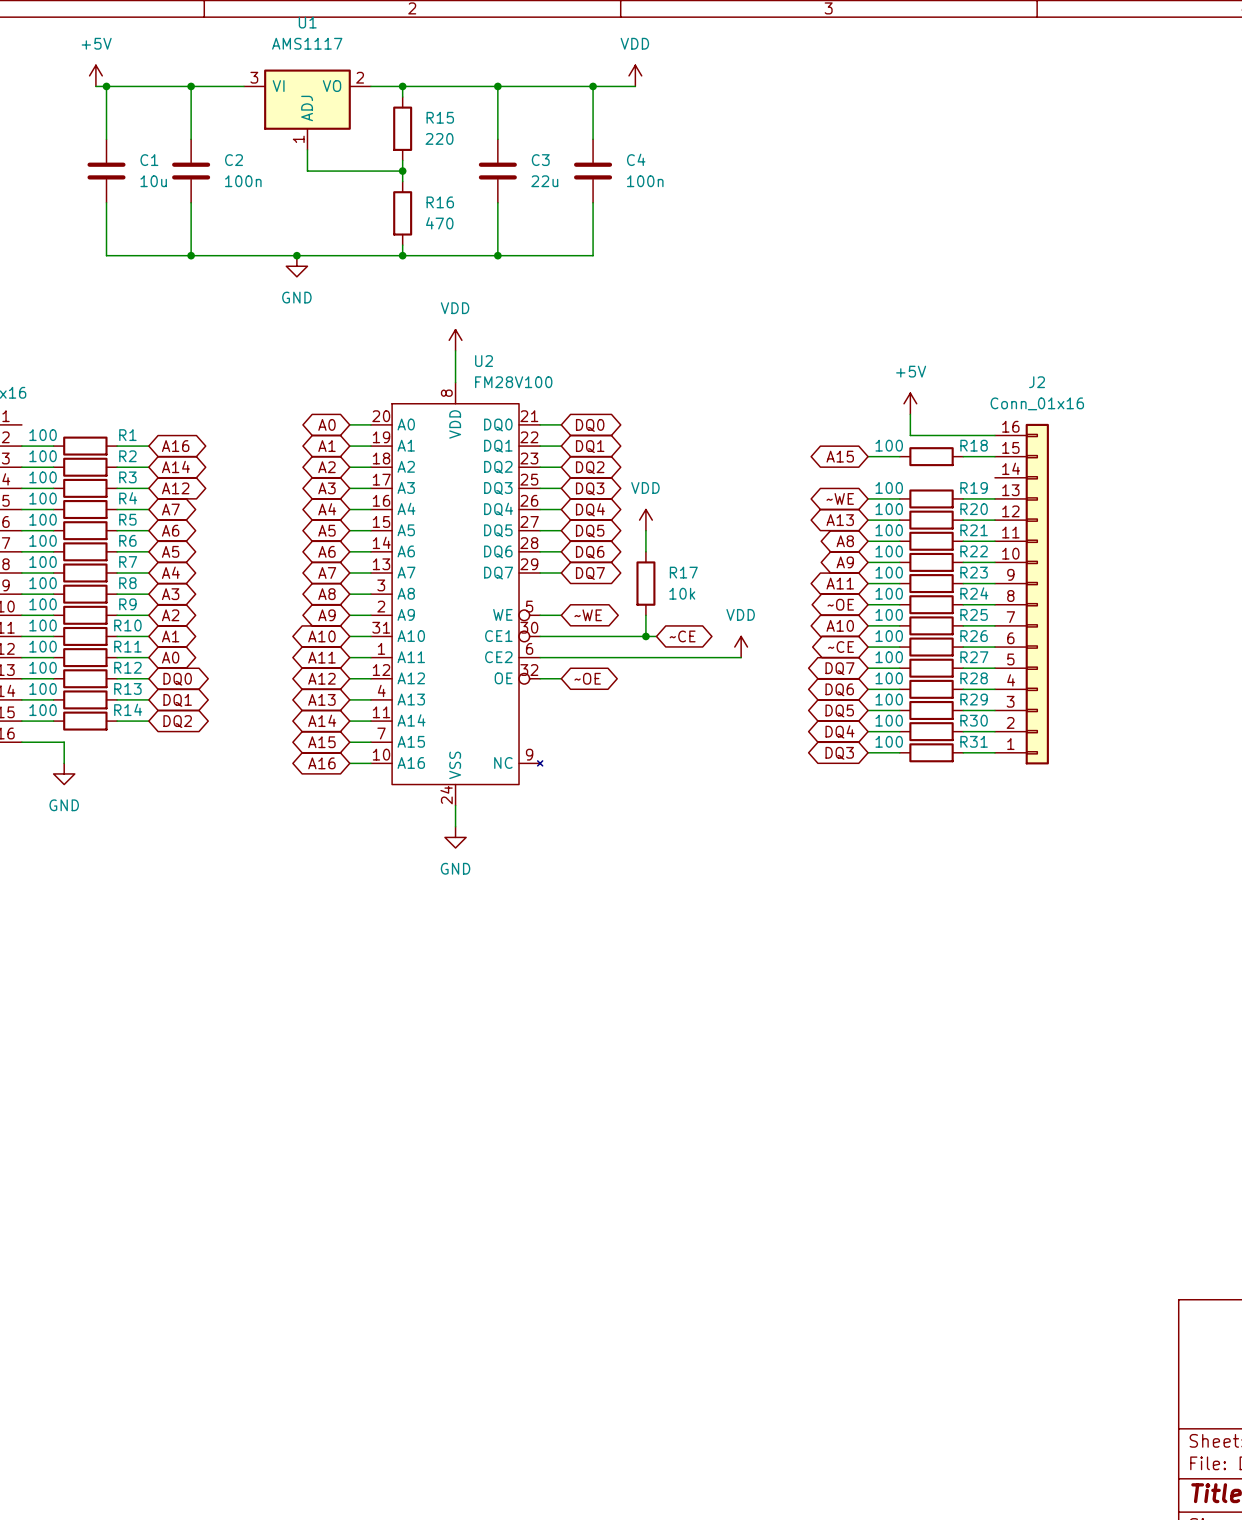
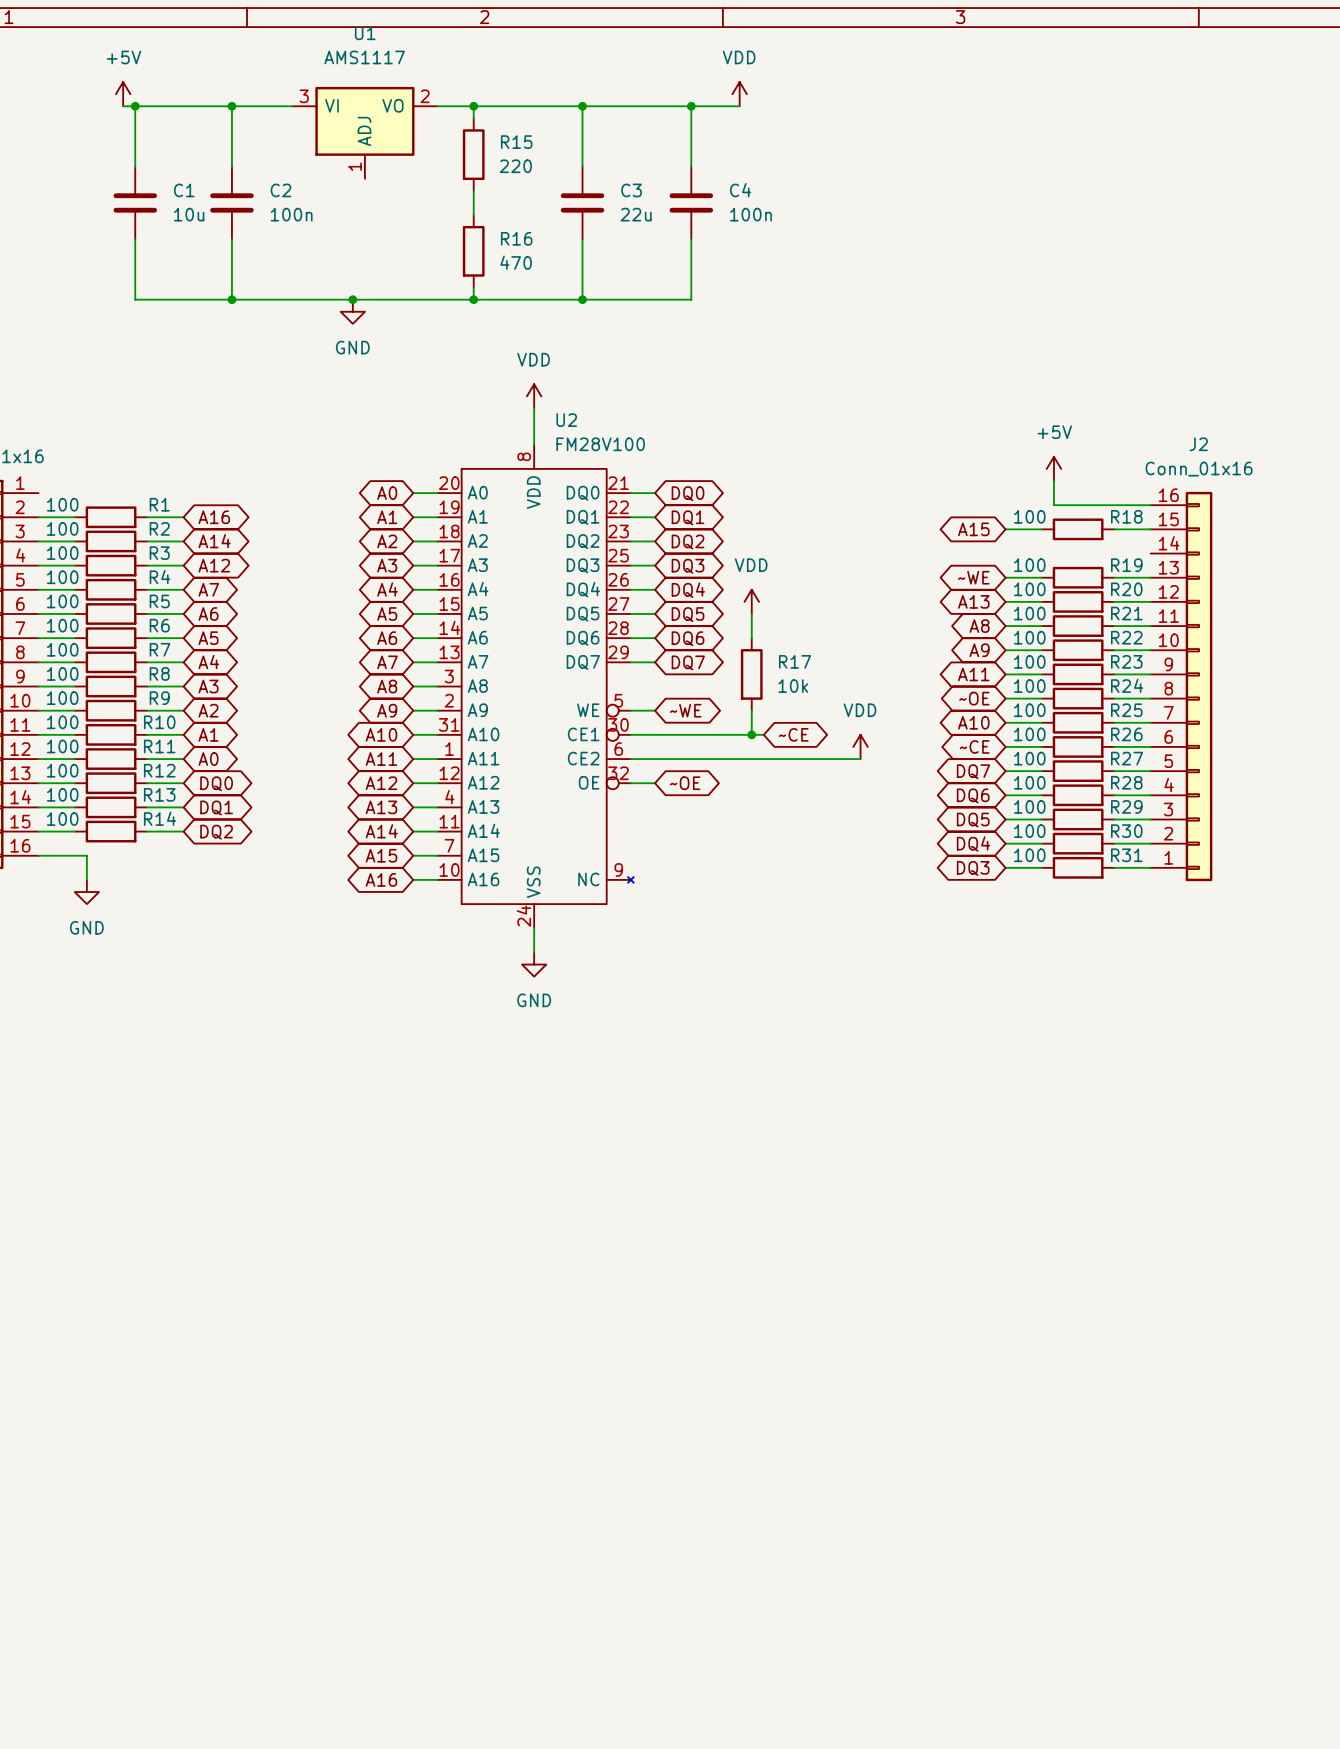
wire: (307, 149) (307, 171) (402, 171) -> none
junction: (402, 171) -> none

